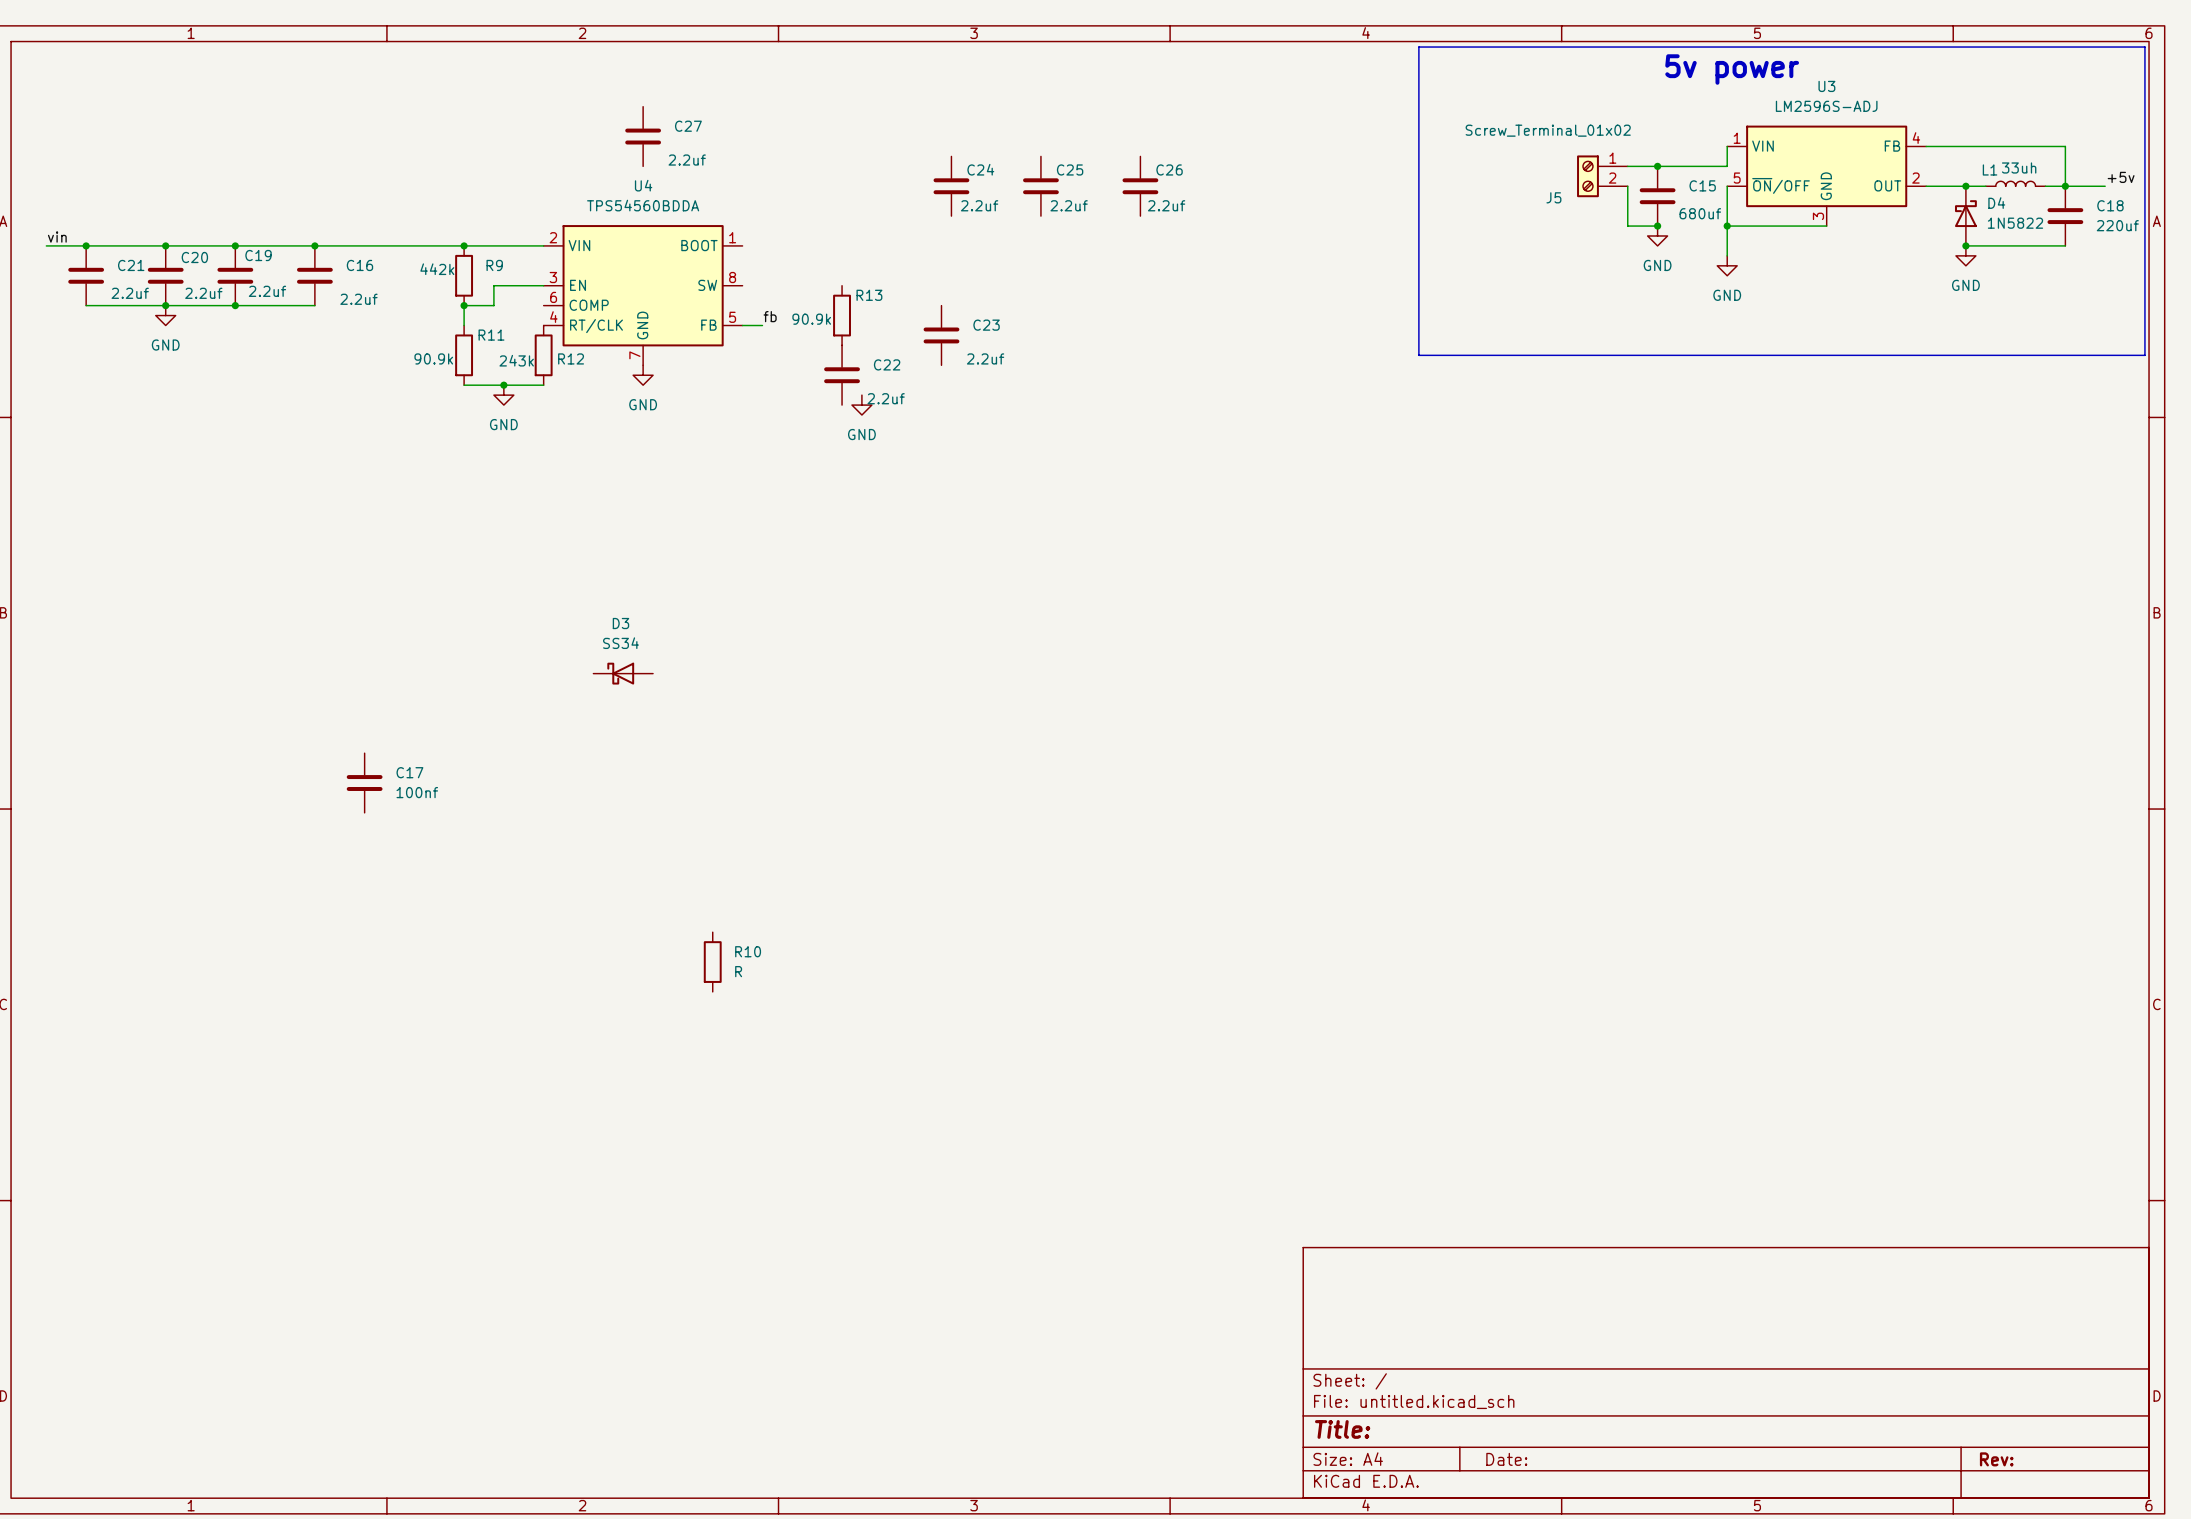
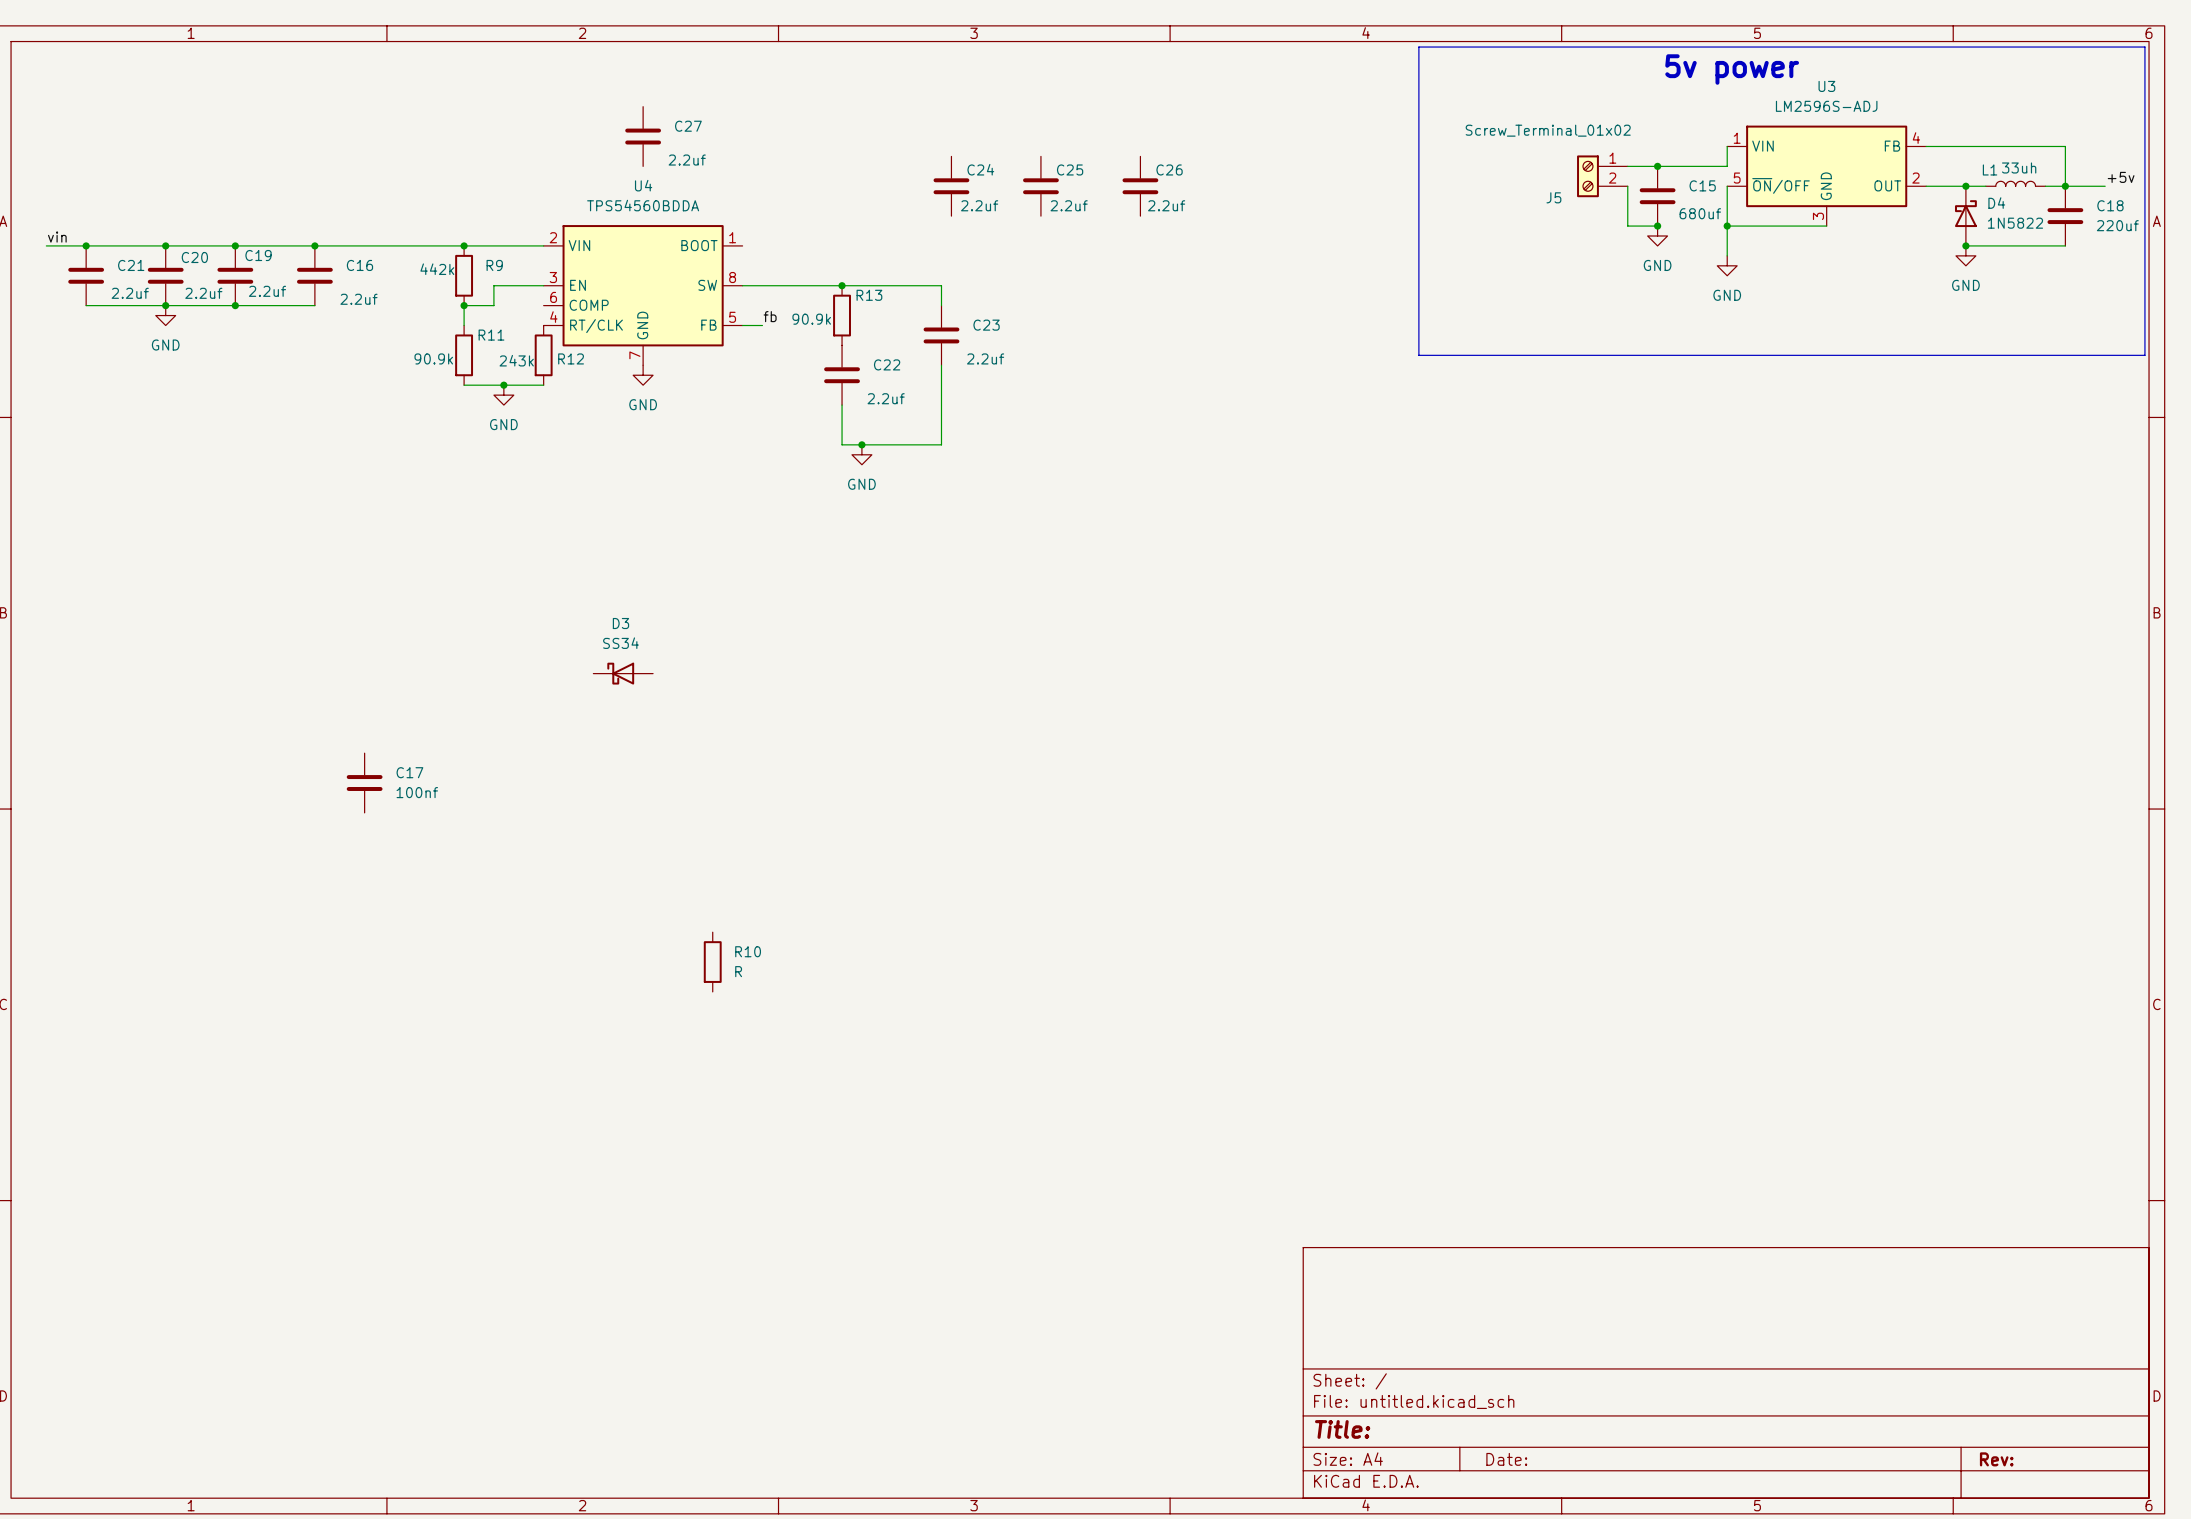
wire: none -> (742, 285) (941, 285) (941, 305)
junction: none -> (842, 285)
wire: none -> (941, 365) (941, 444) (842, 444) (842, 405)
power symbol position: GND (861, 405) -> GND (861, 454)
junction: none -> (861, 444)

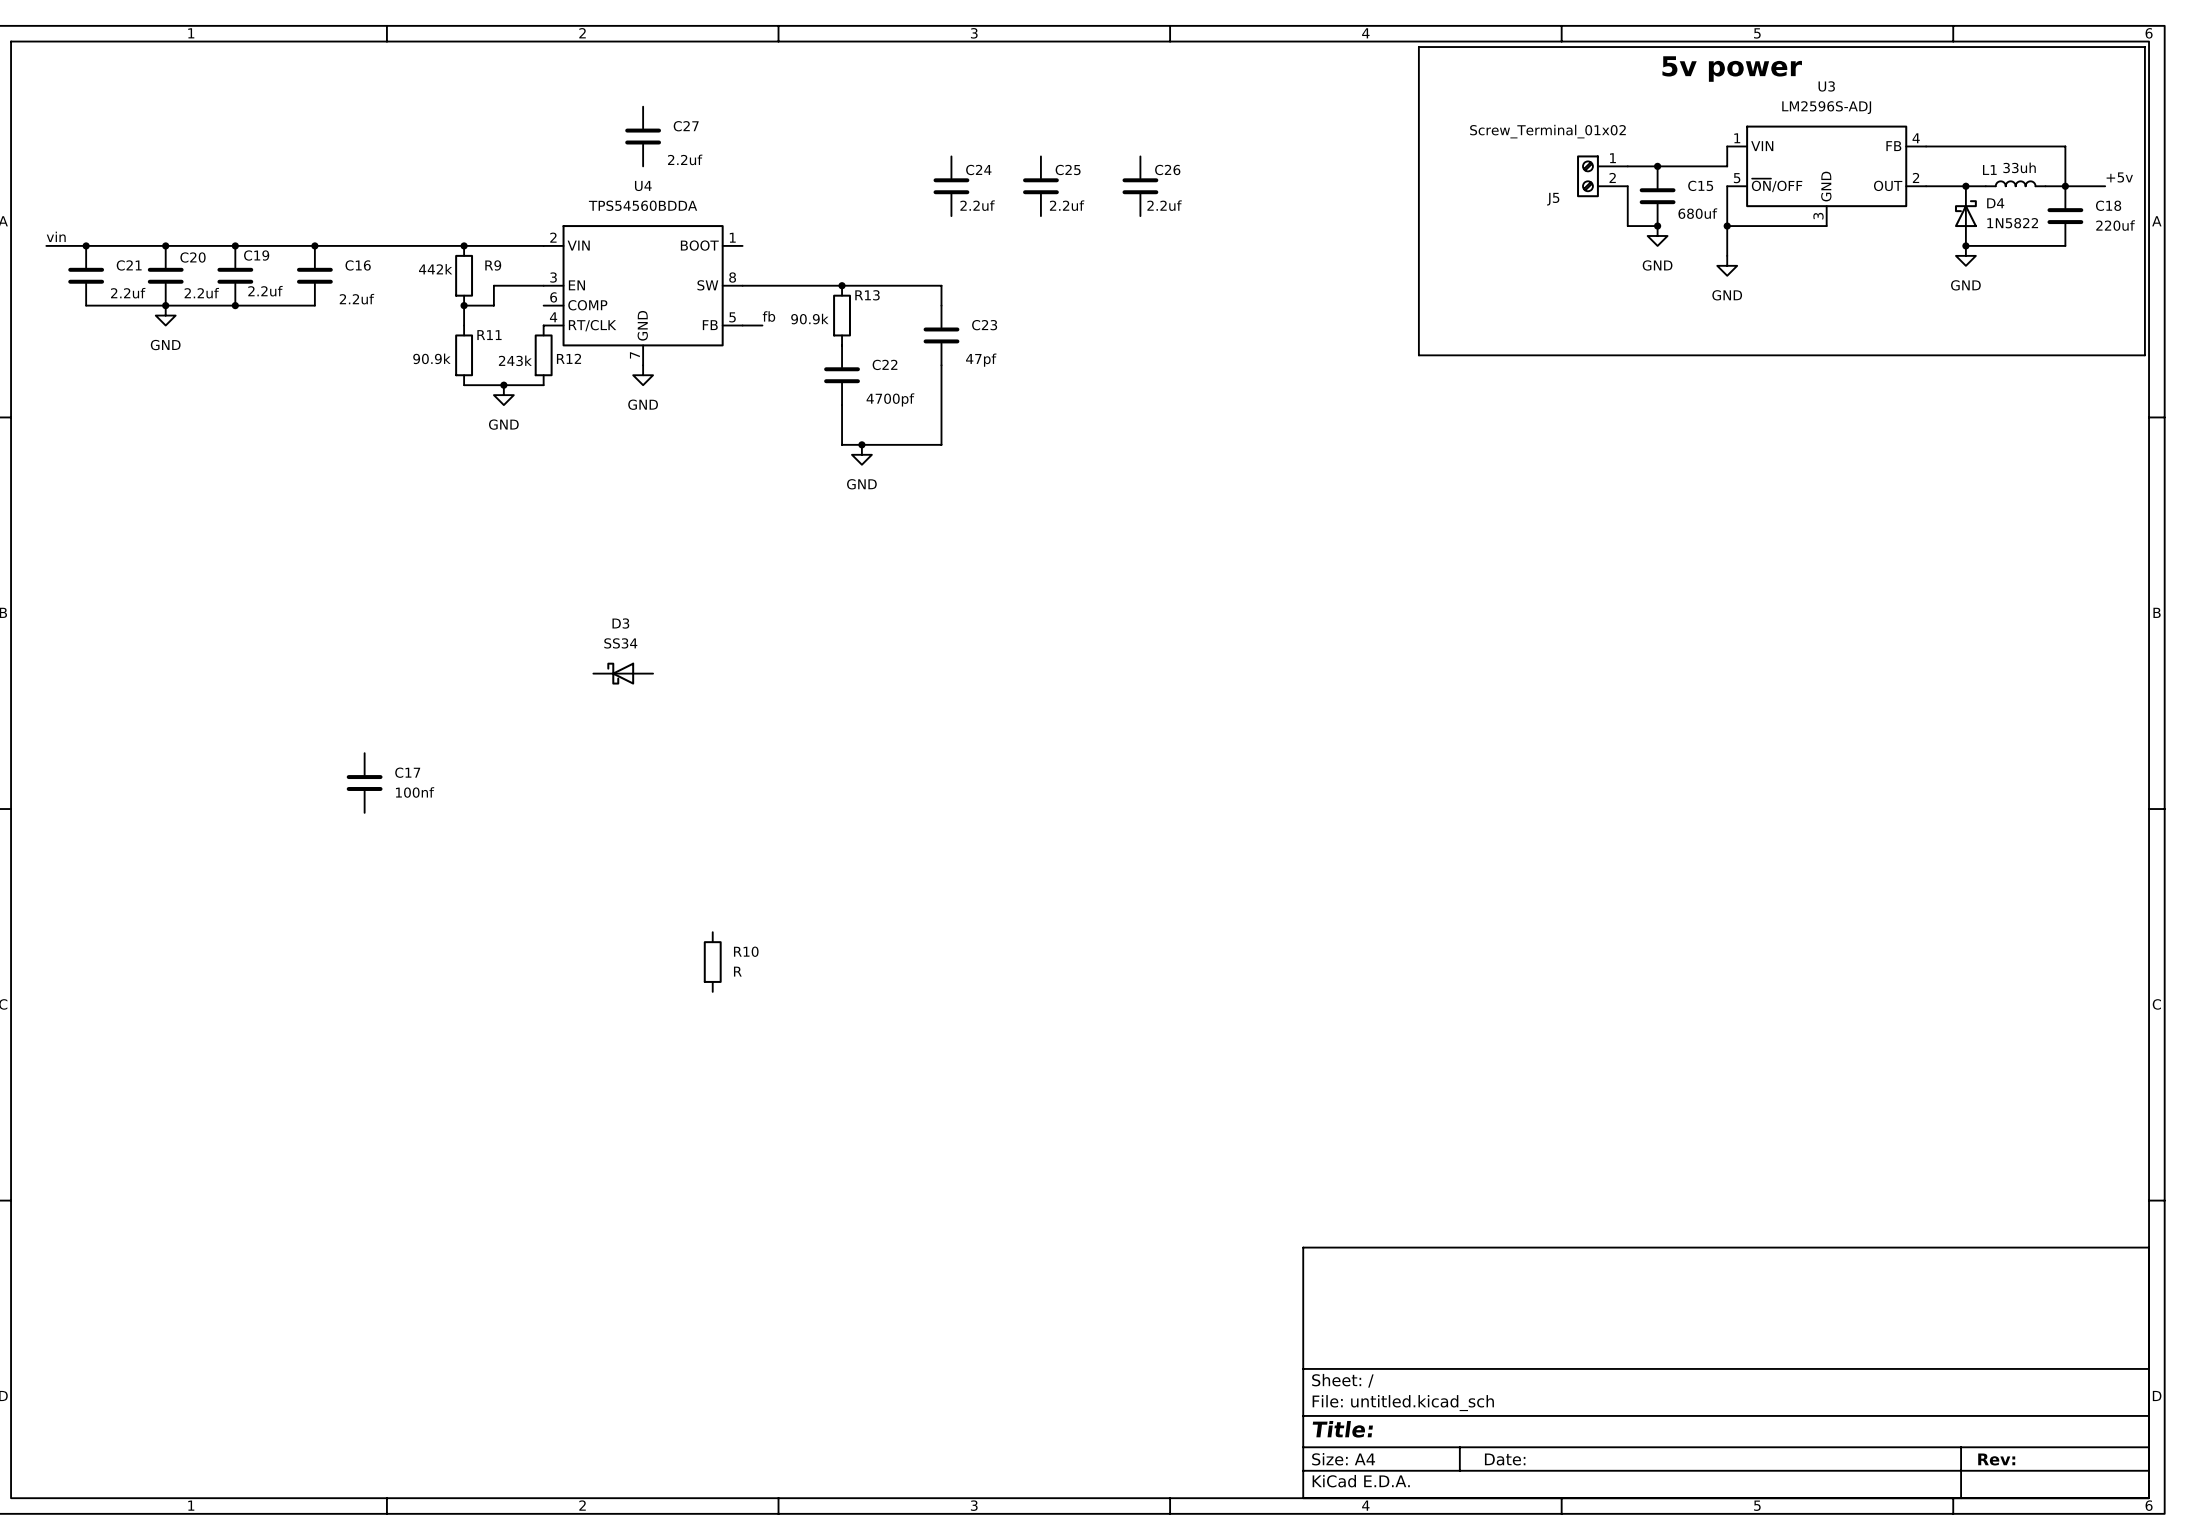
C23 value: 2.2uf (985, 358) -> 47pf (981, 360)
C22 value: 2.2uf (886, 398) -> 4700pf (890, 399)

